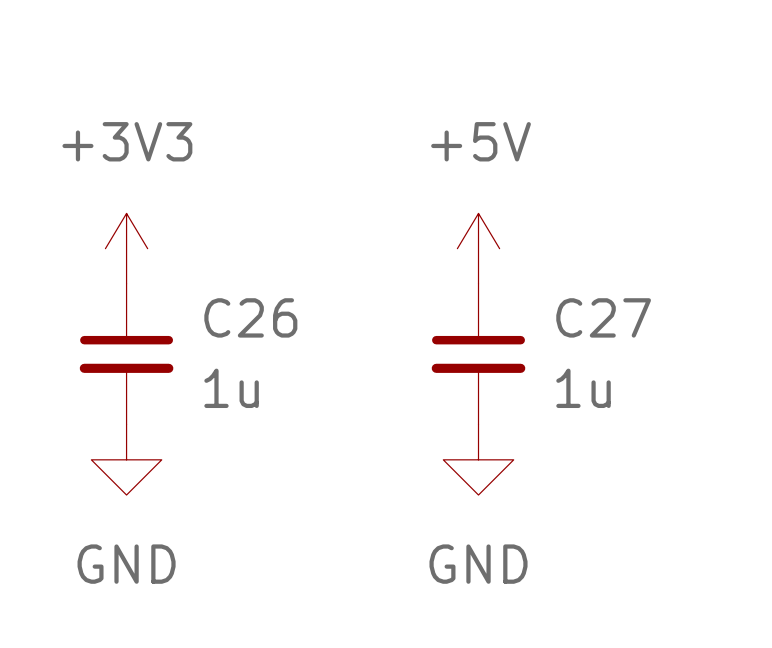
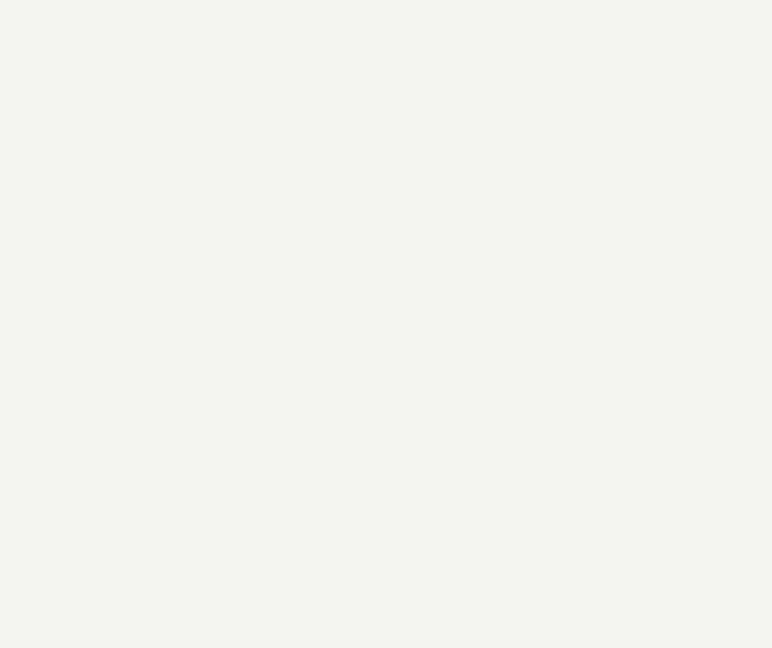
power symbol: +3V3 (126, 248) -> none
power symbol: +5V (478, 248) -> none
C26: 1u (126, 354) -> none
C27: 1u (478, 354) -> none
power symbol: GND (126, 459) -> none
power symbol: GND (478, 459) -> none

